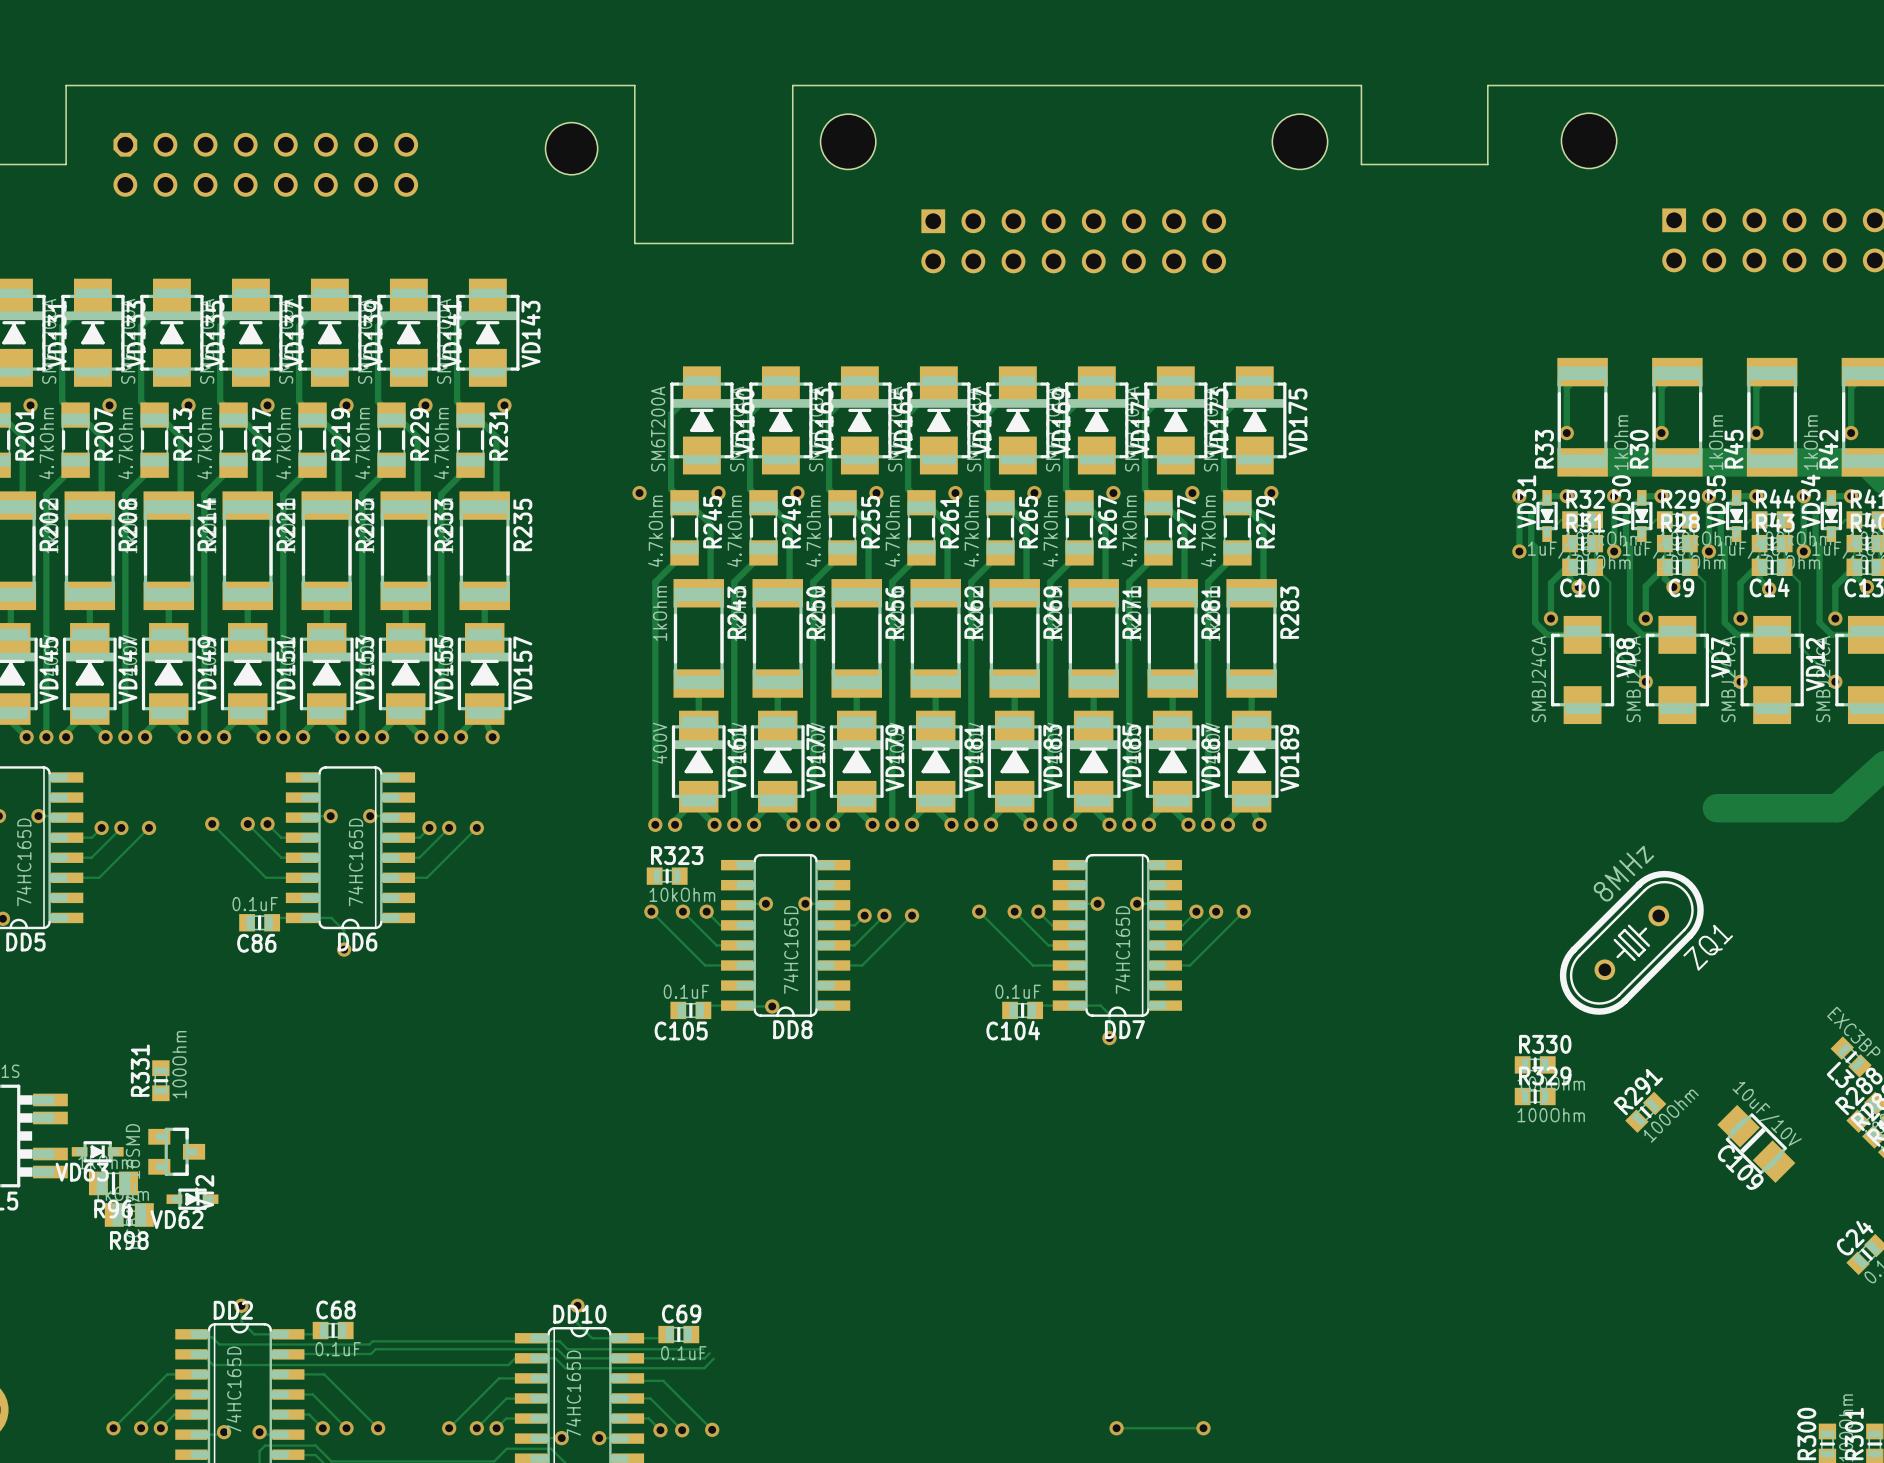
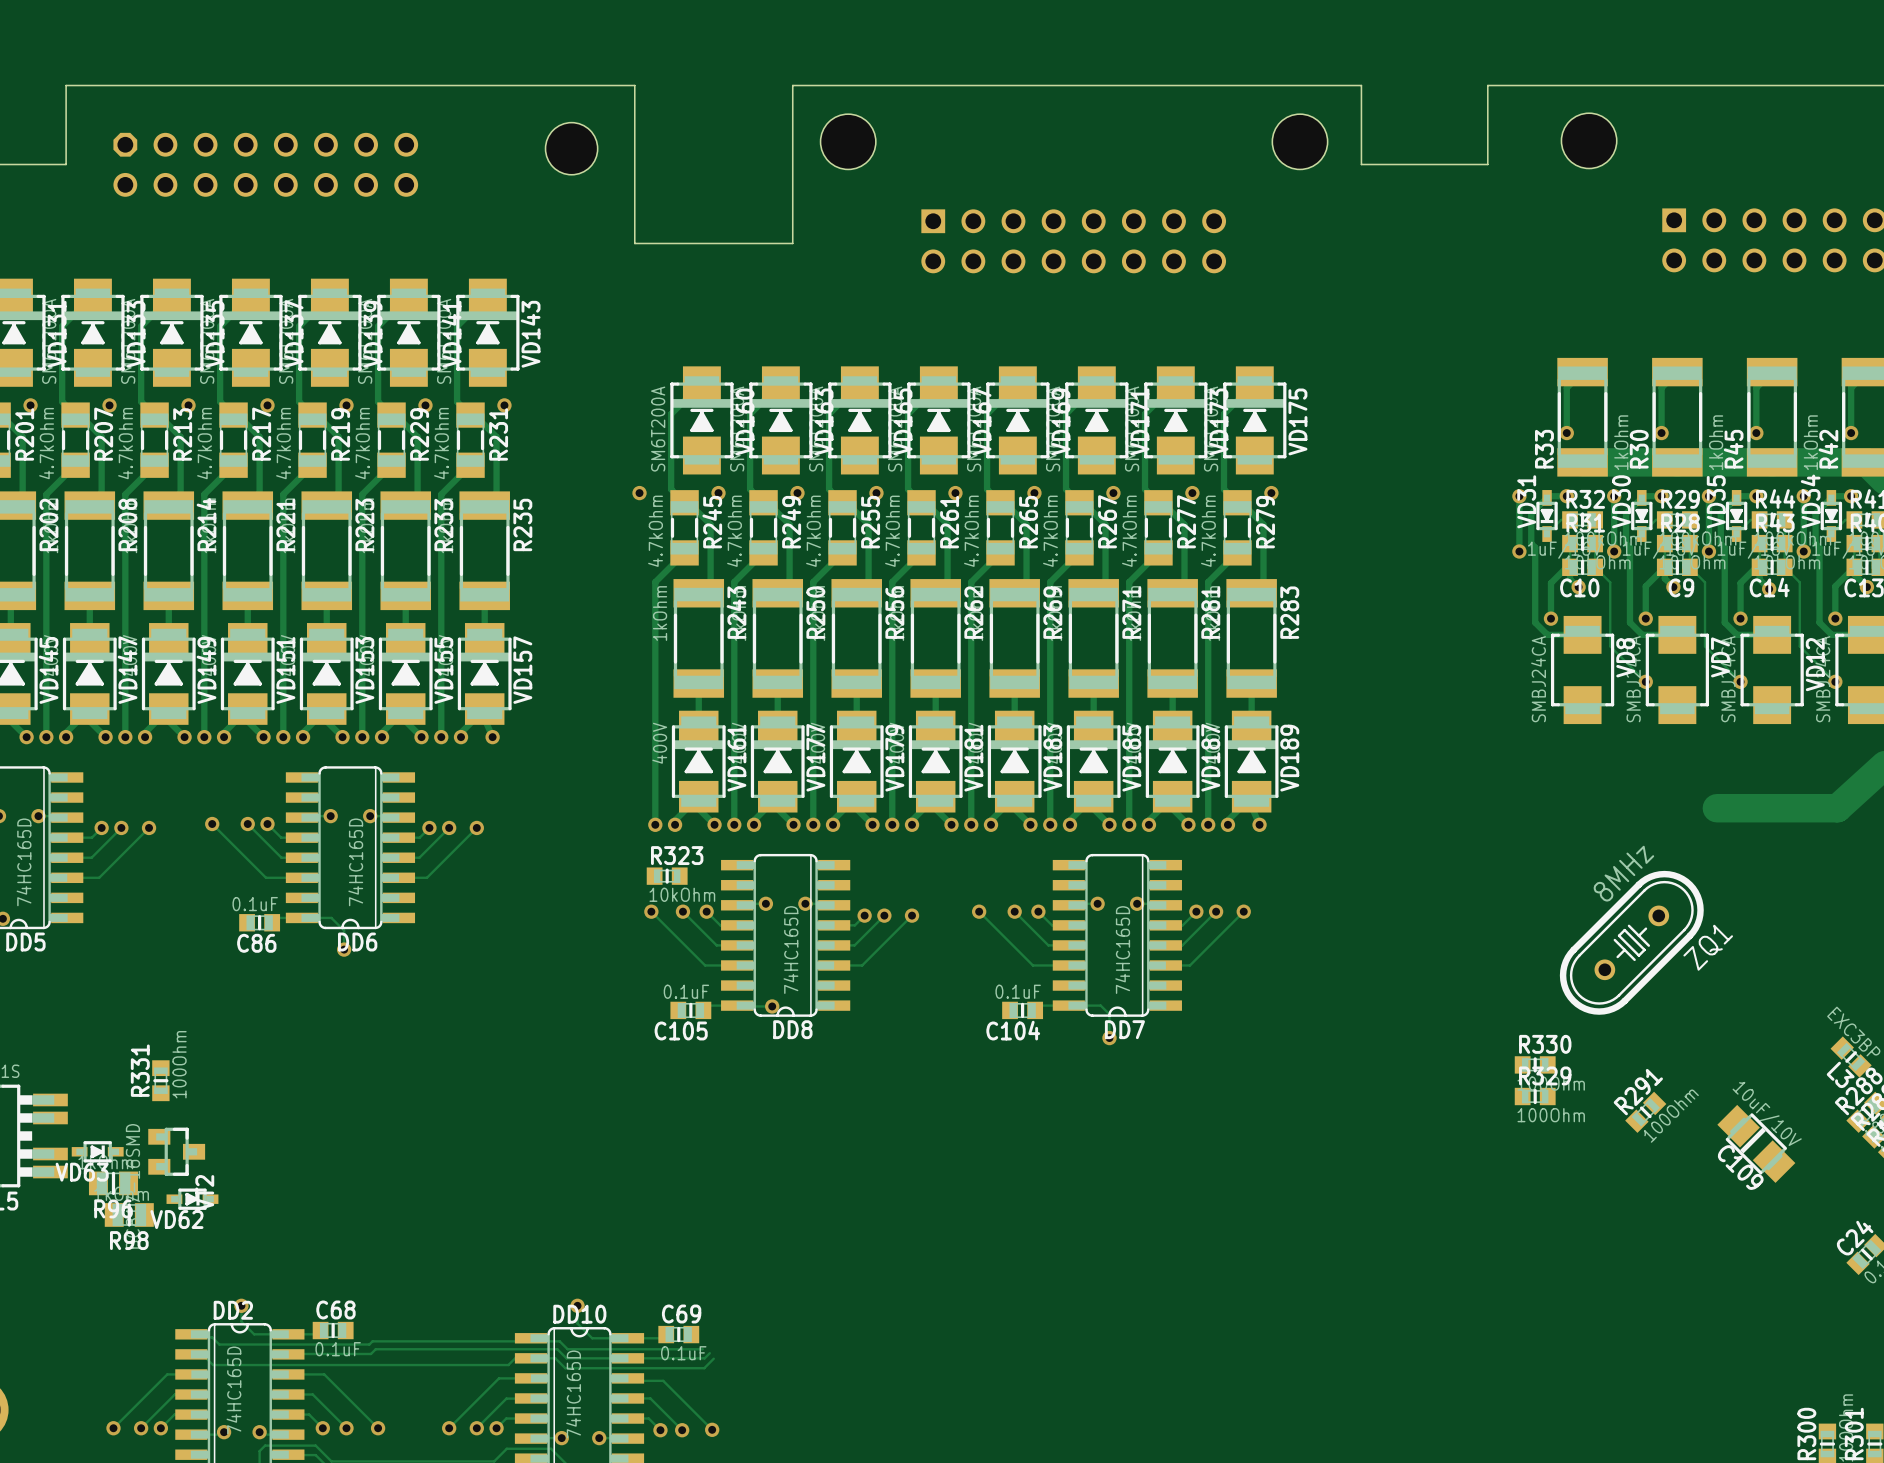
via: (1116, 1428) -> none
track: (1203, 1428) (1116, 1428) -> none
via: (1203, 1428) -> none

